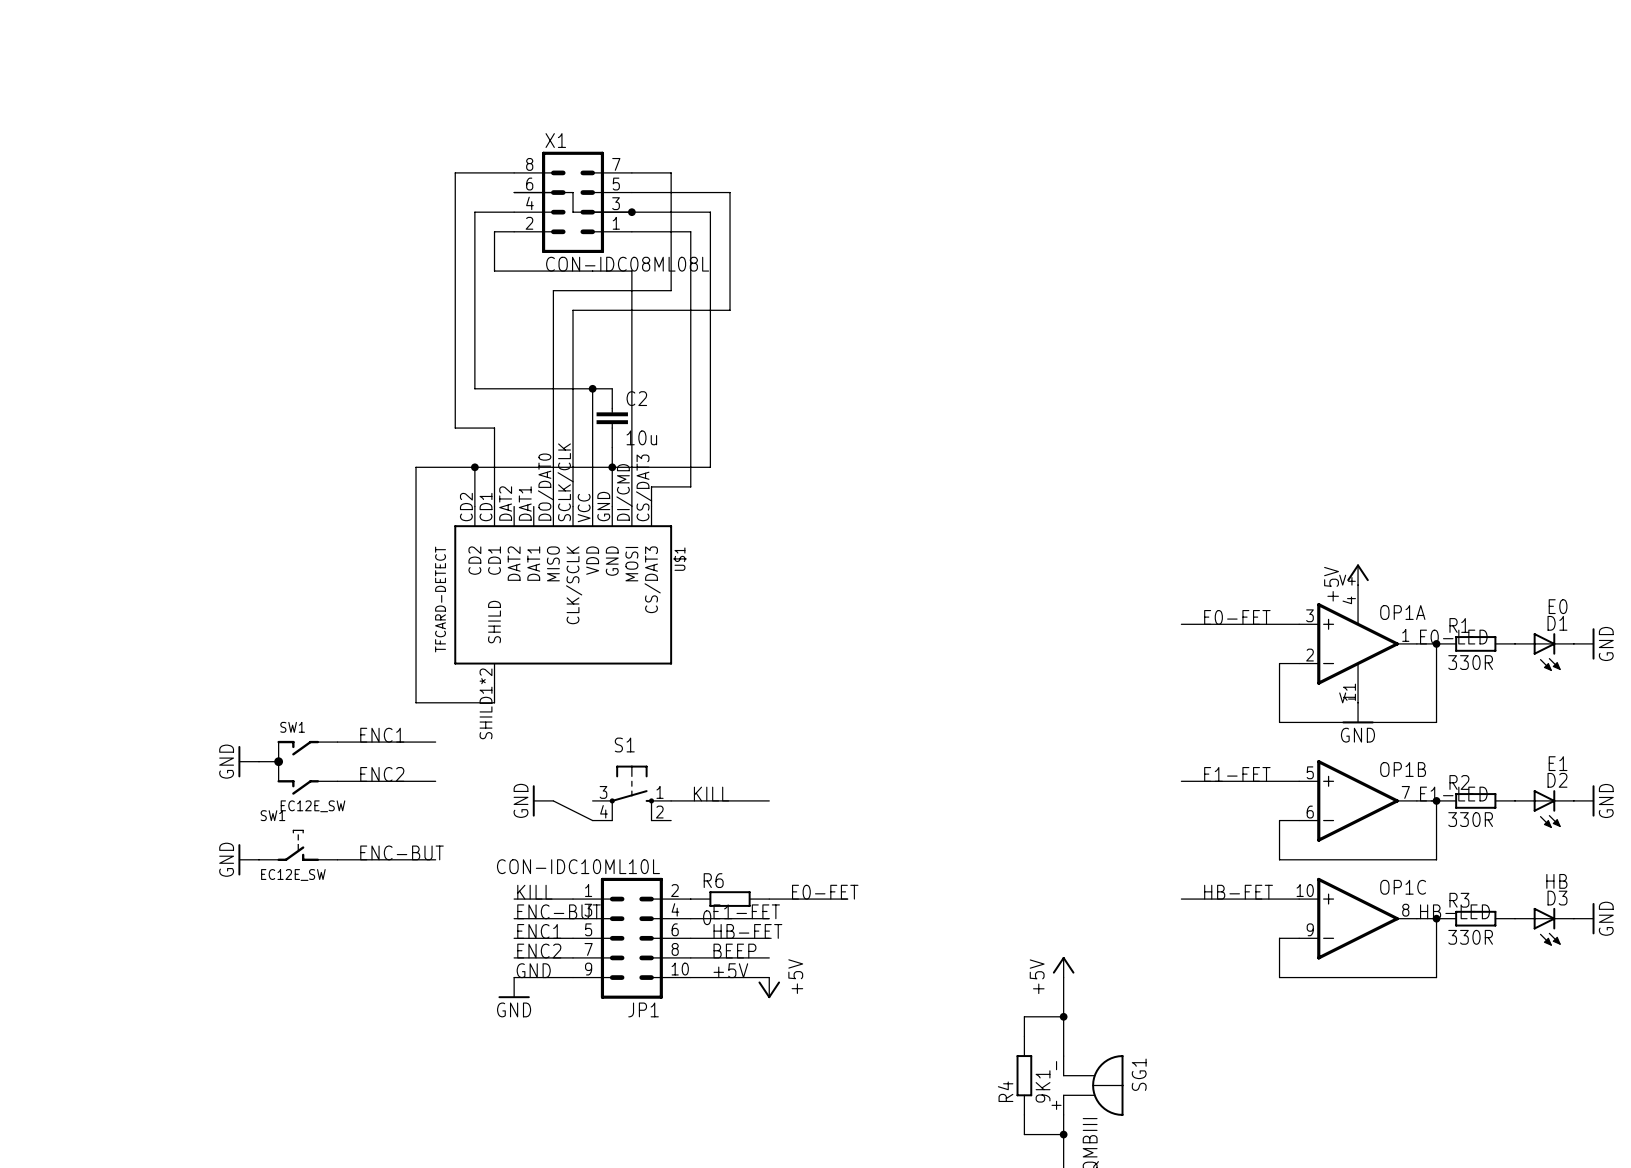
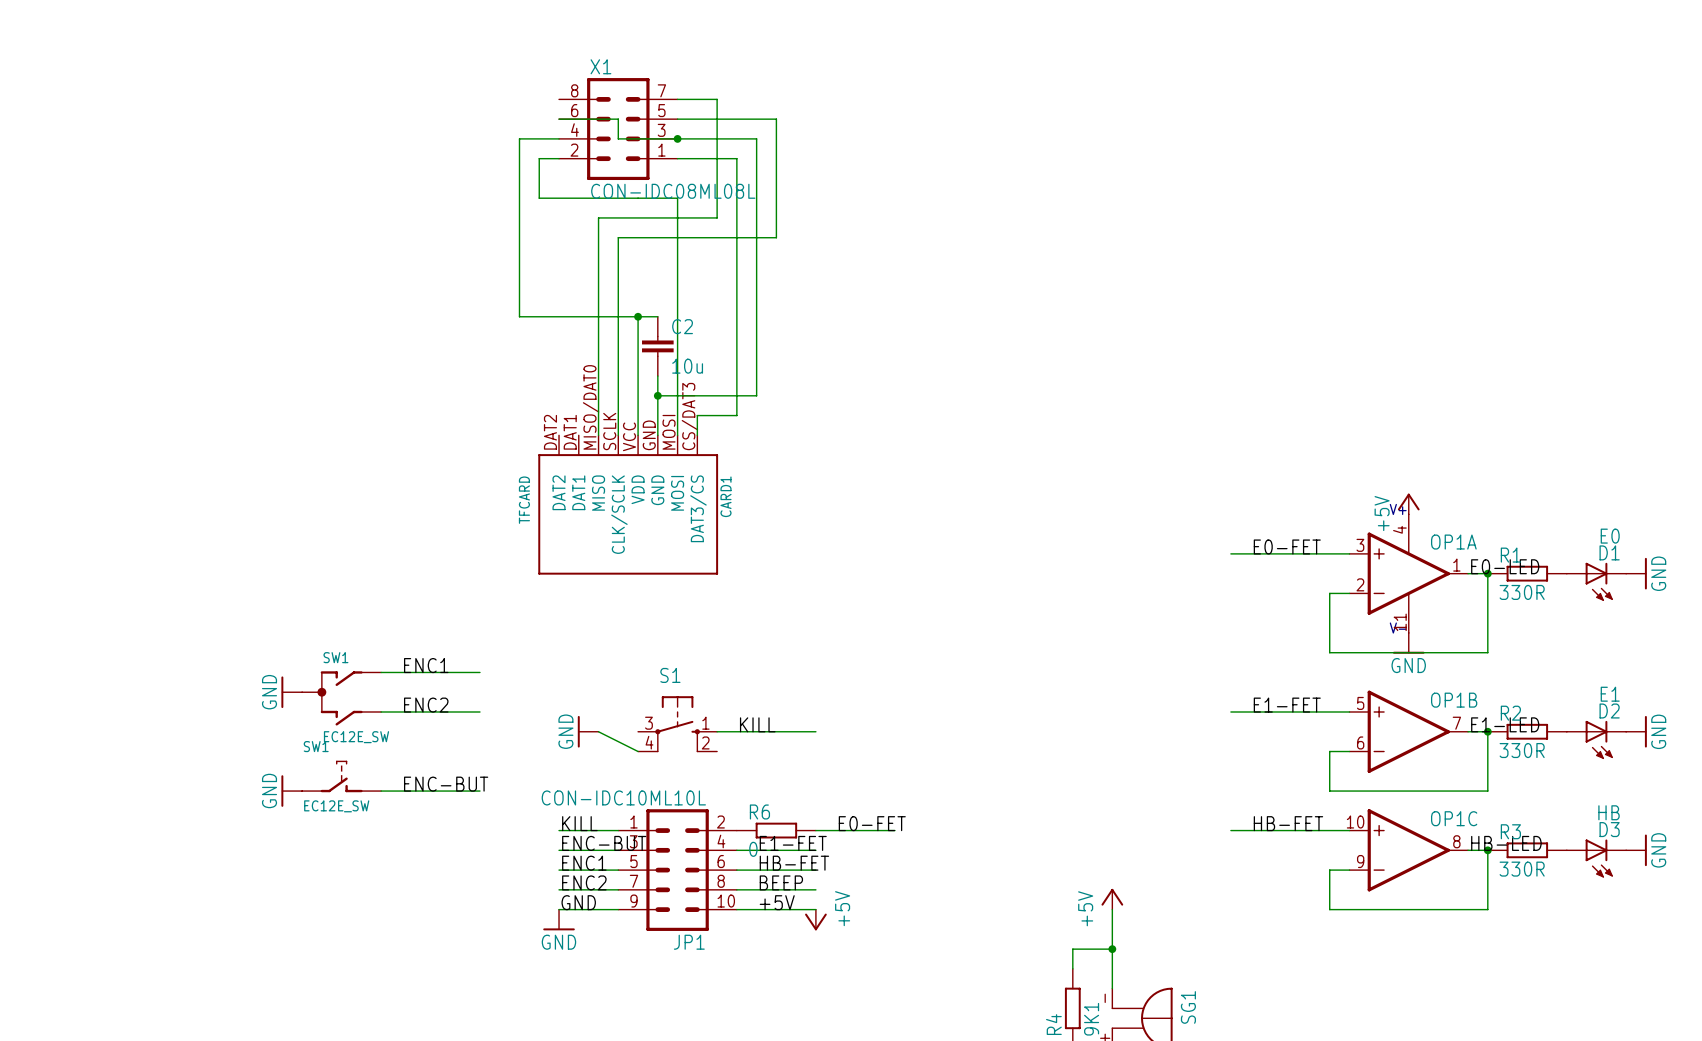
wire: (514, 172) (455, 172) (455, 428) (494, 428) (494, 506) -> none
wire: (474, 467) (474, 506) -> none
junction: (474, 467) -> none
wire: (612, 467) (416, 467) (416, 702) (494, 702) (494, 683) -> none
CARD1: none -> TFCARD (628, 504)
U$1: TFCARD-DETECT (563, 594) -> none

